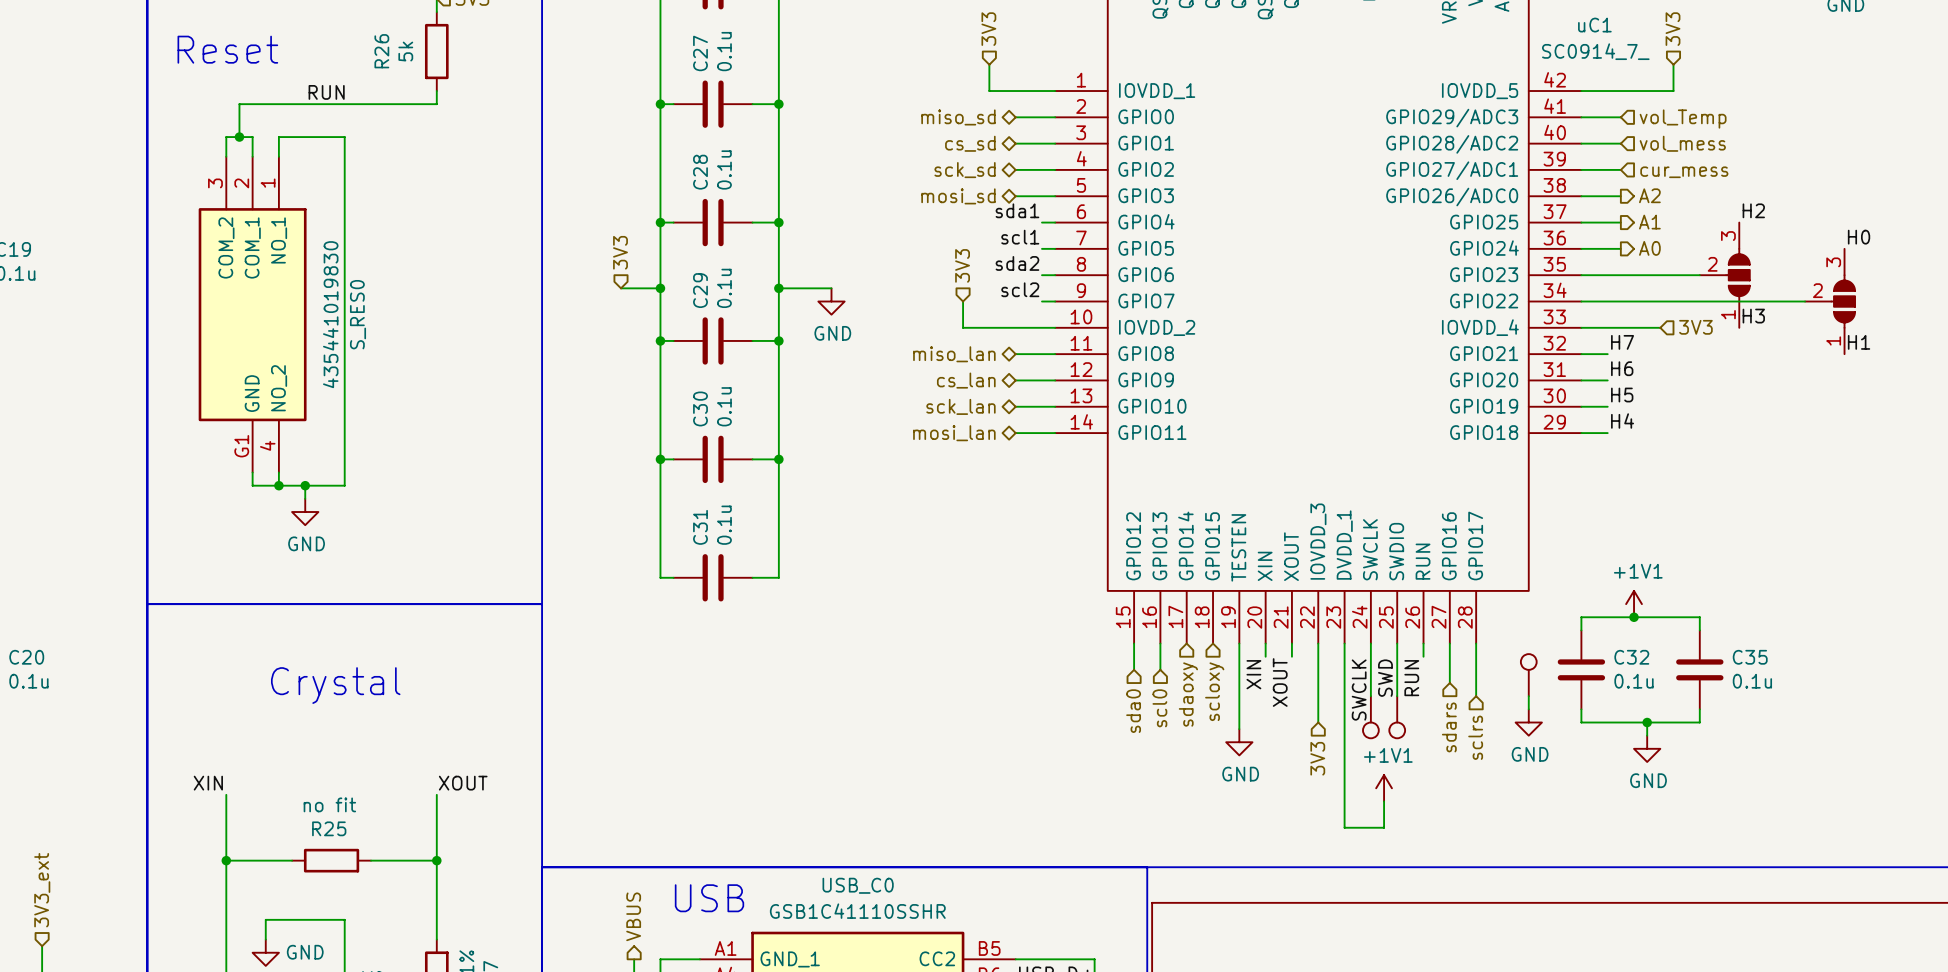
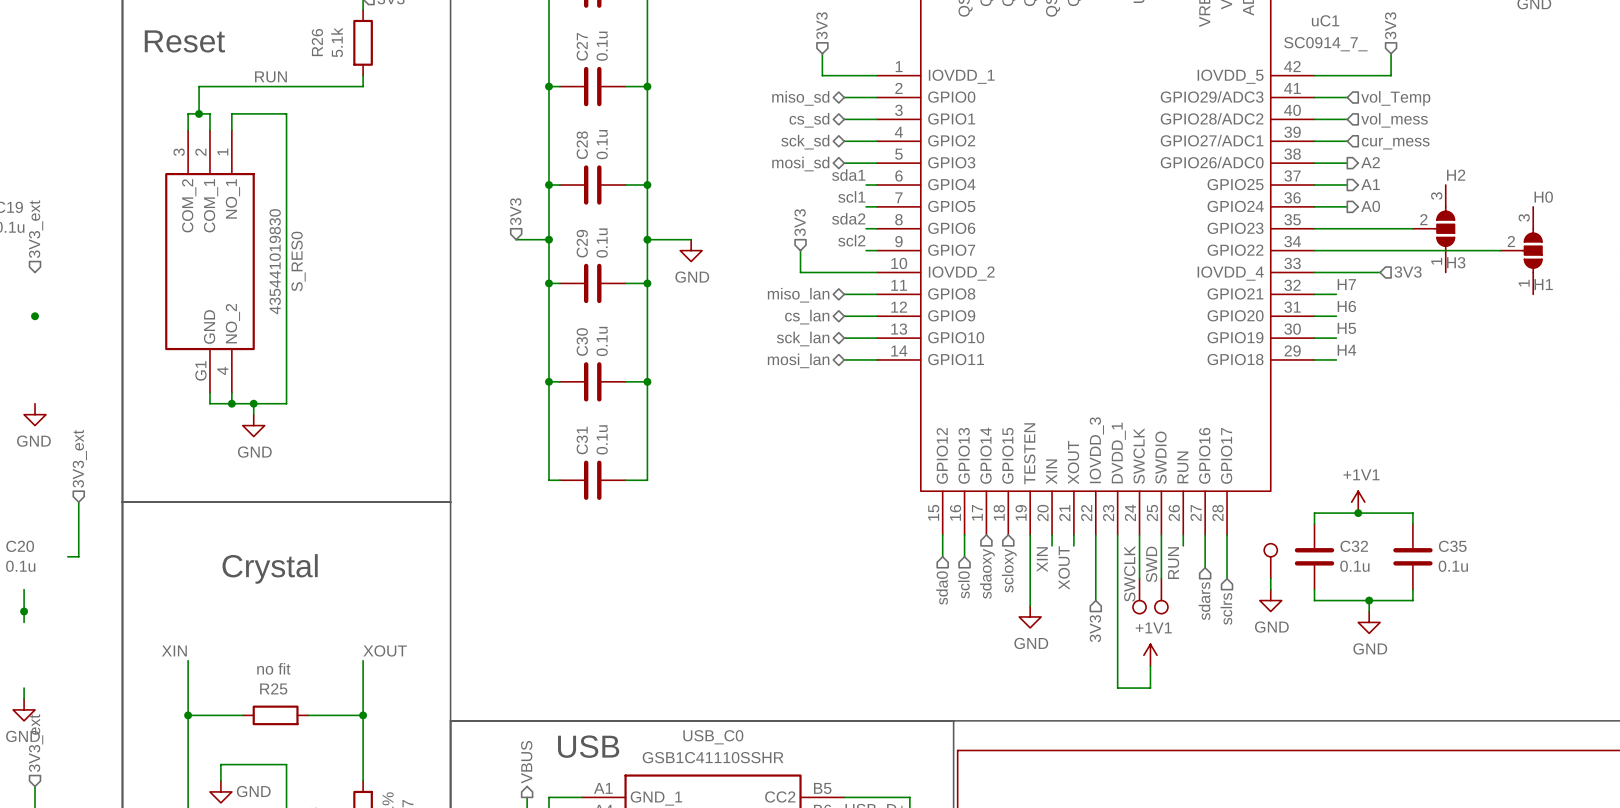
R26 value: 5k (405, 51) -> 5.1k (337, 42)
hierarchical label: none -> 3V3_ext (36, 229)
junction: none -> (35, 316)
power symbol: none -> GND (35, 414)
hierarchical label: none -> 3V3_ext (79, 458)
wire: none -> (78, 502) (78, 556) (67, 556)
wire: none -> (24, 589) (24, 622)
junction: none -> (24, 611)
wire: none -> (24, 688) (24, 698)
power symbol: none -> GND (24, 709)

